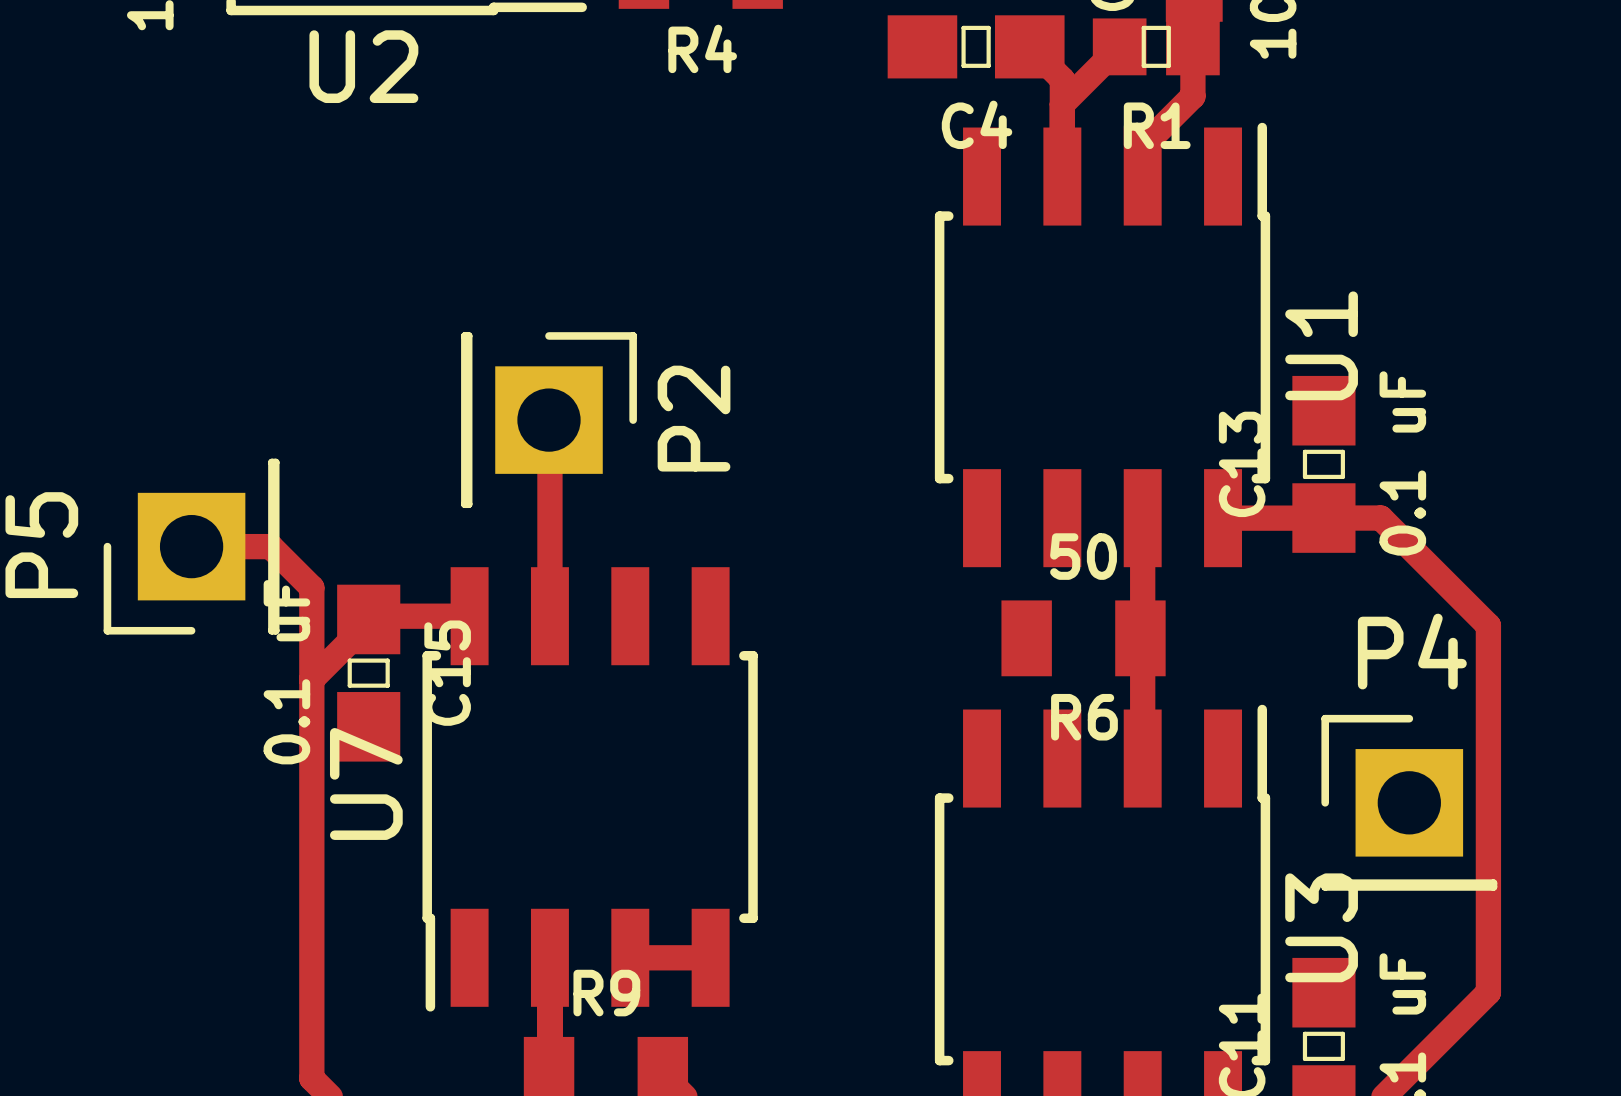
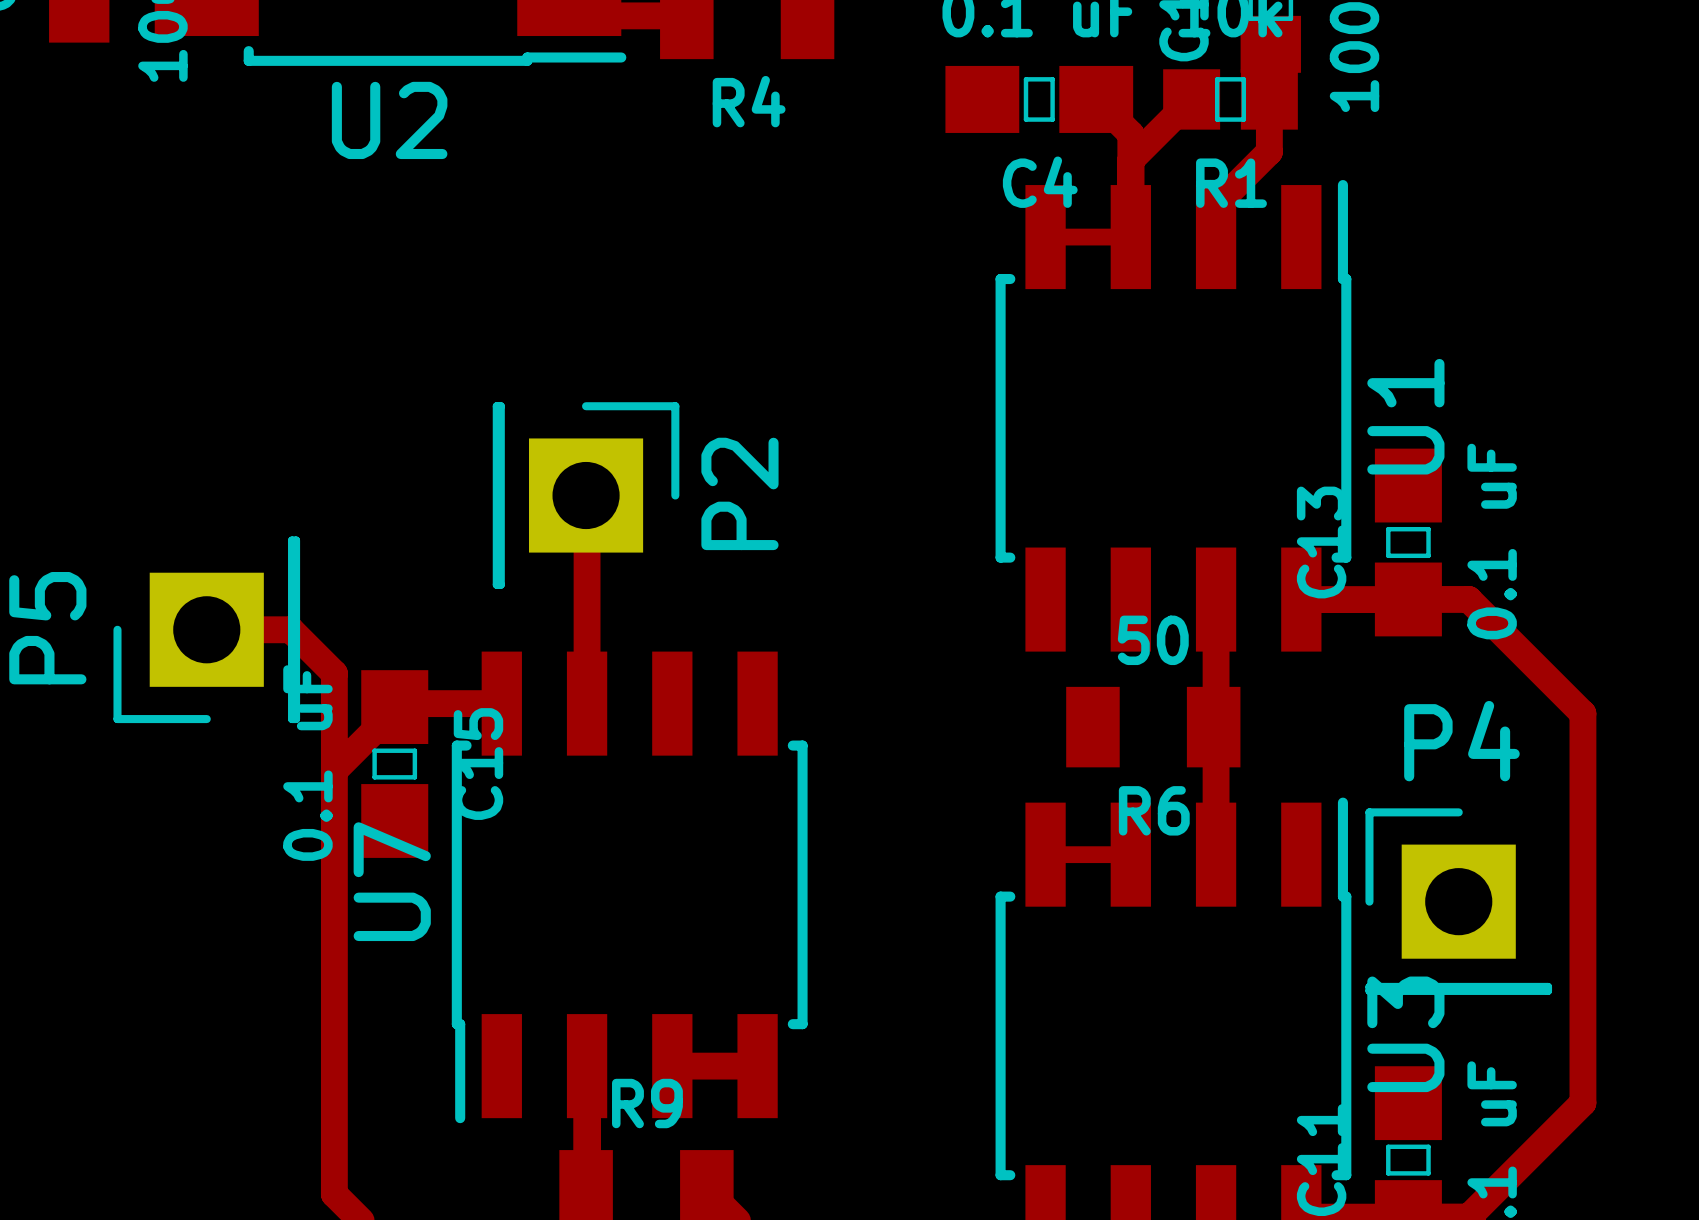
track: none -> (1045, 237) (1130, 237)
track: none -> (1045, 854) (1130, 854)
P4 position: (1409, 802) -> (1458, 901)

